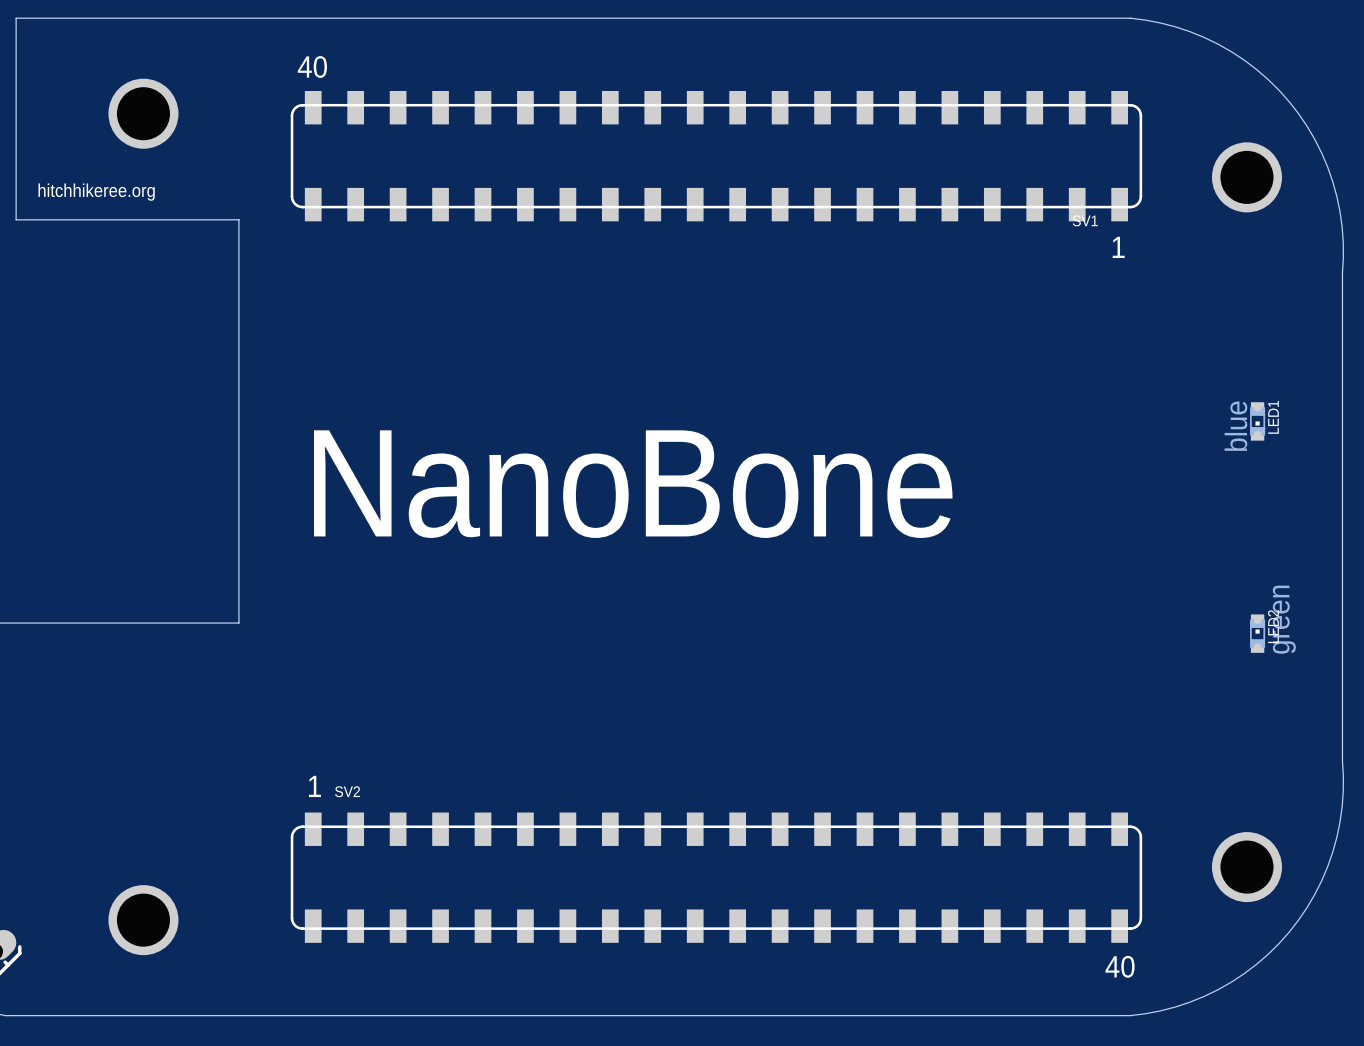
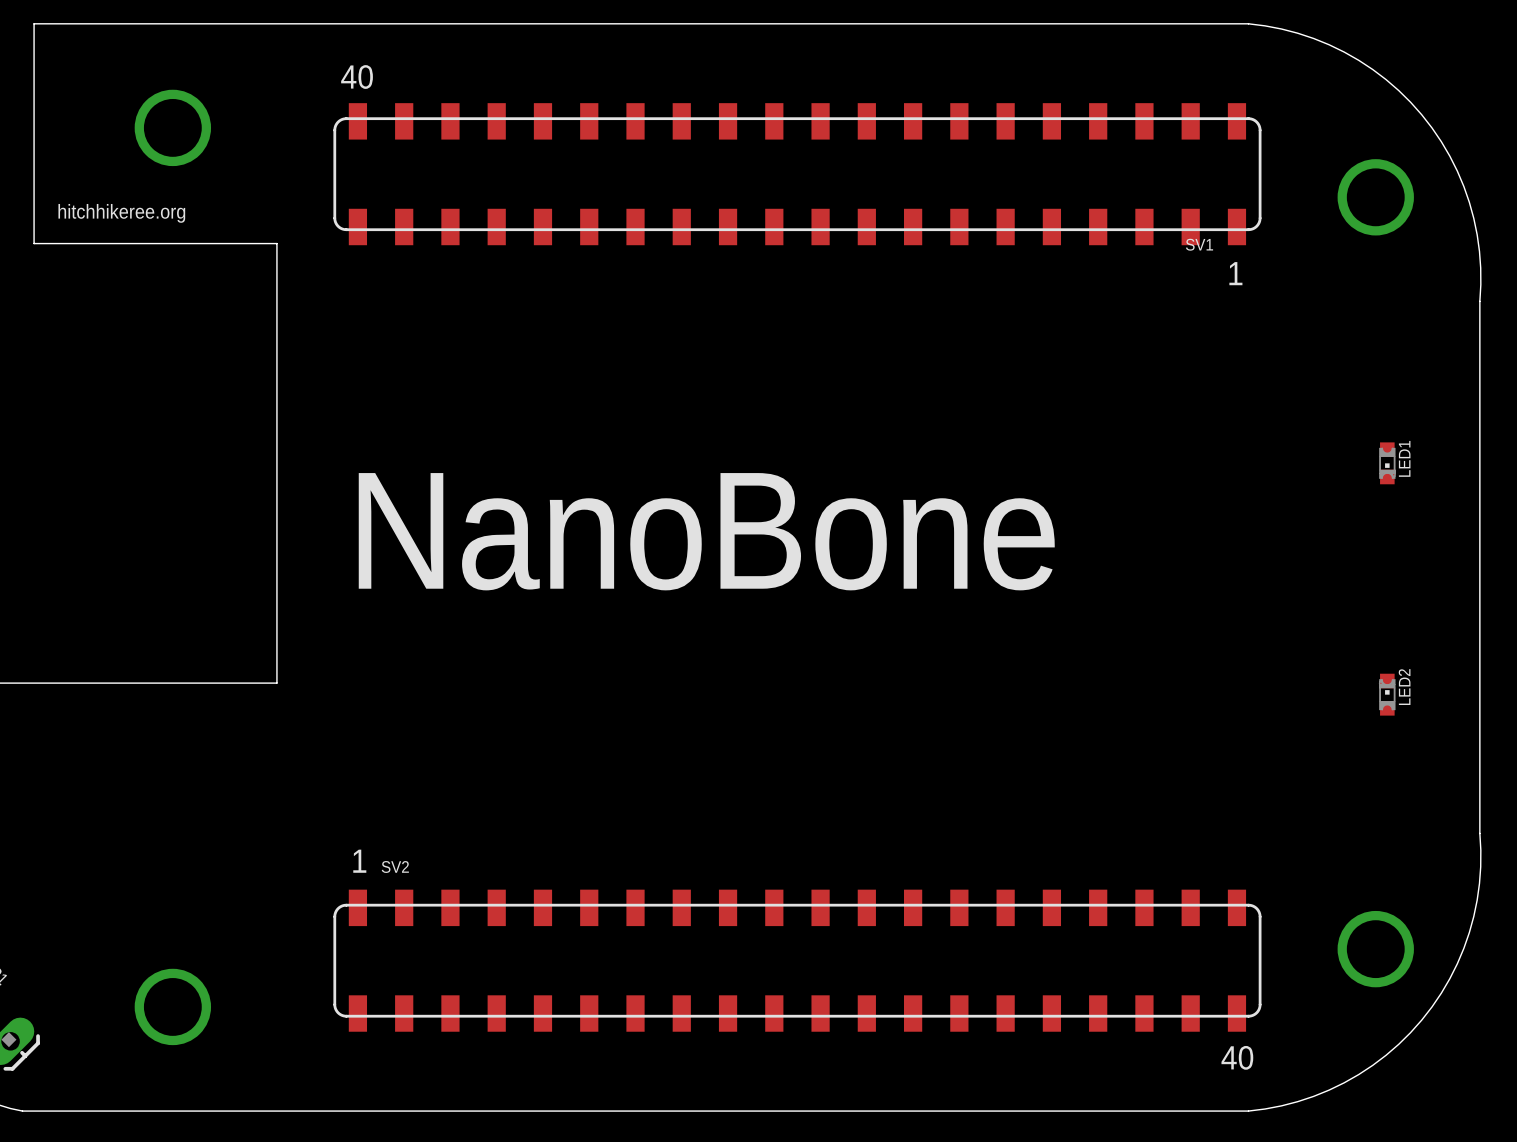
LED1 value: blue (1235, 426) -> none
LED2 value: green (1284, 619) -> none

